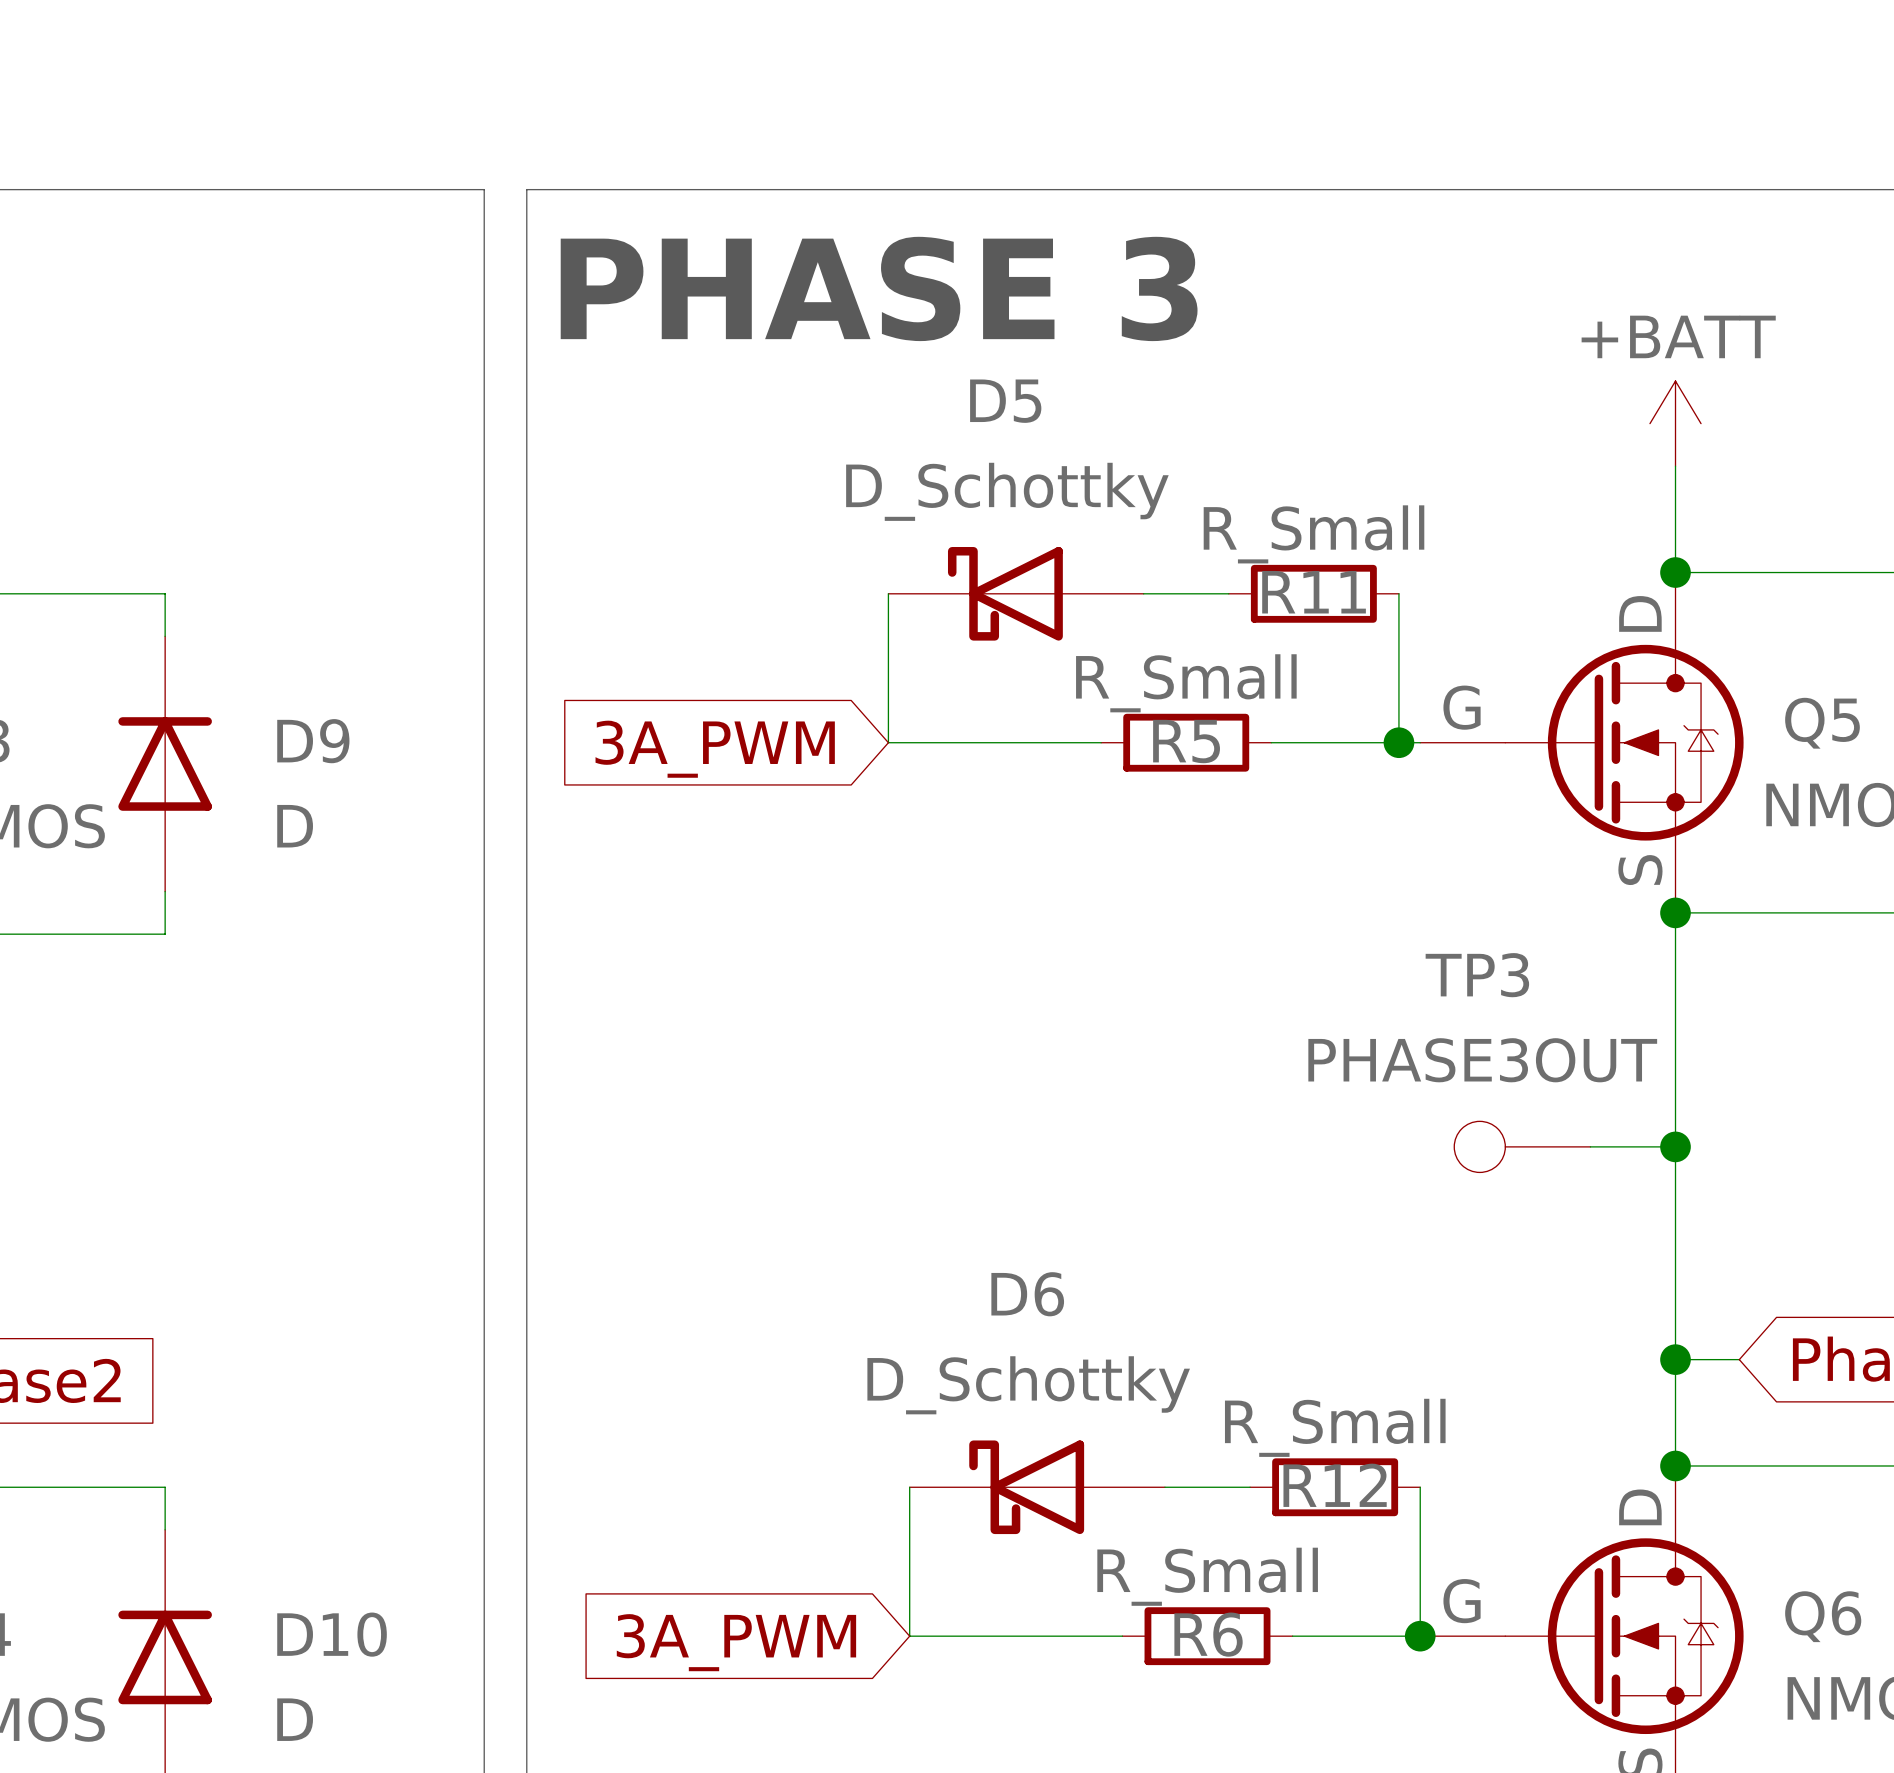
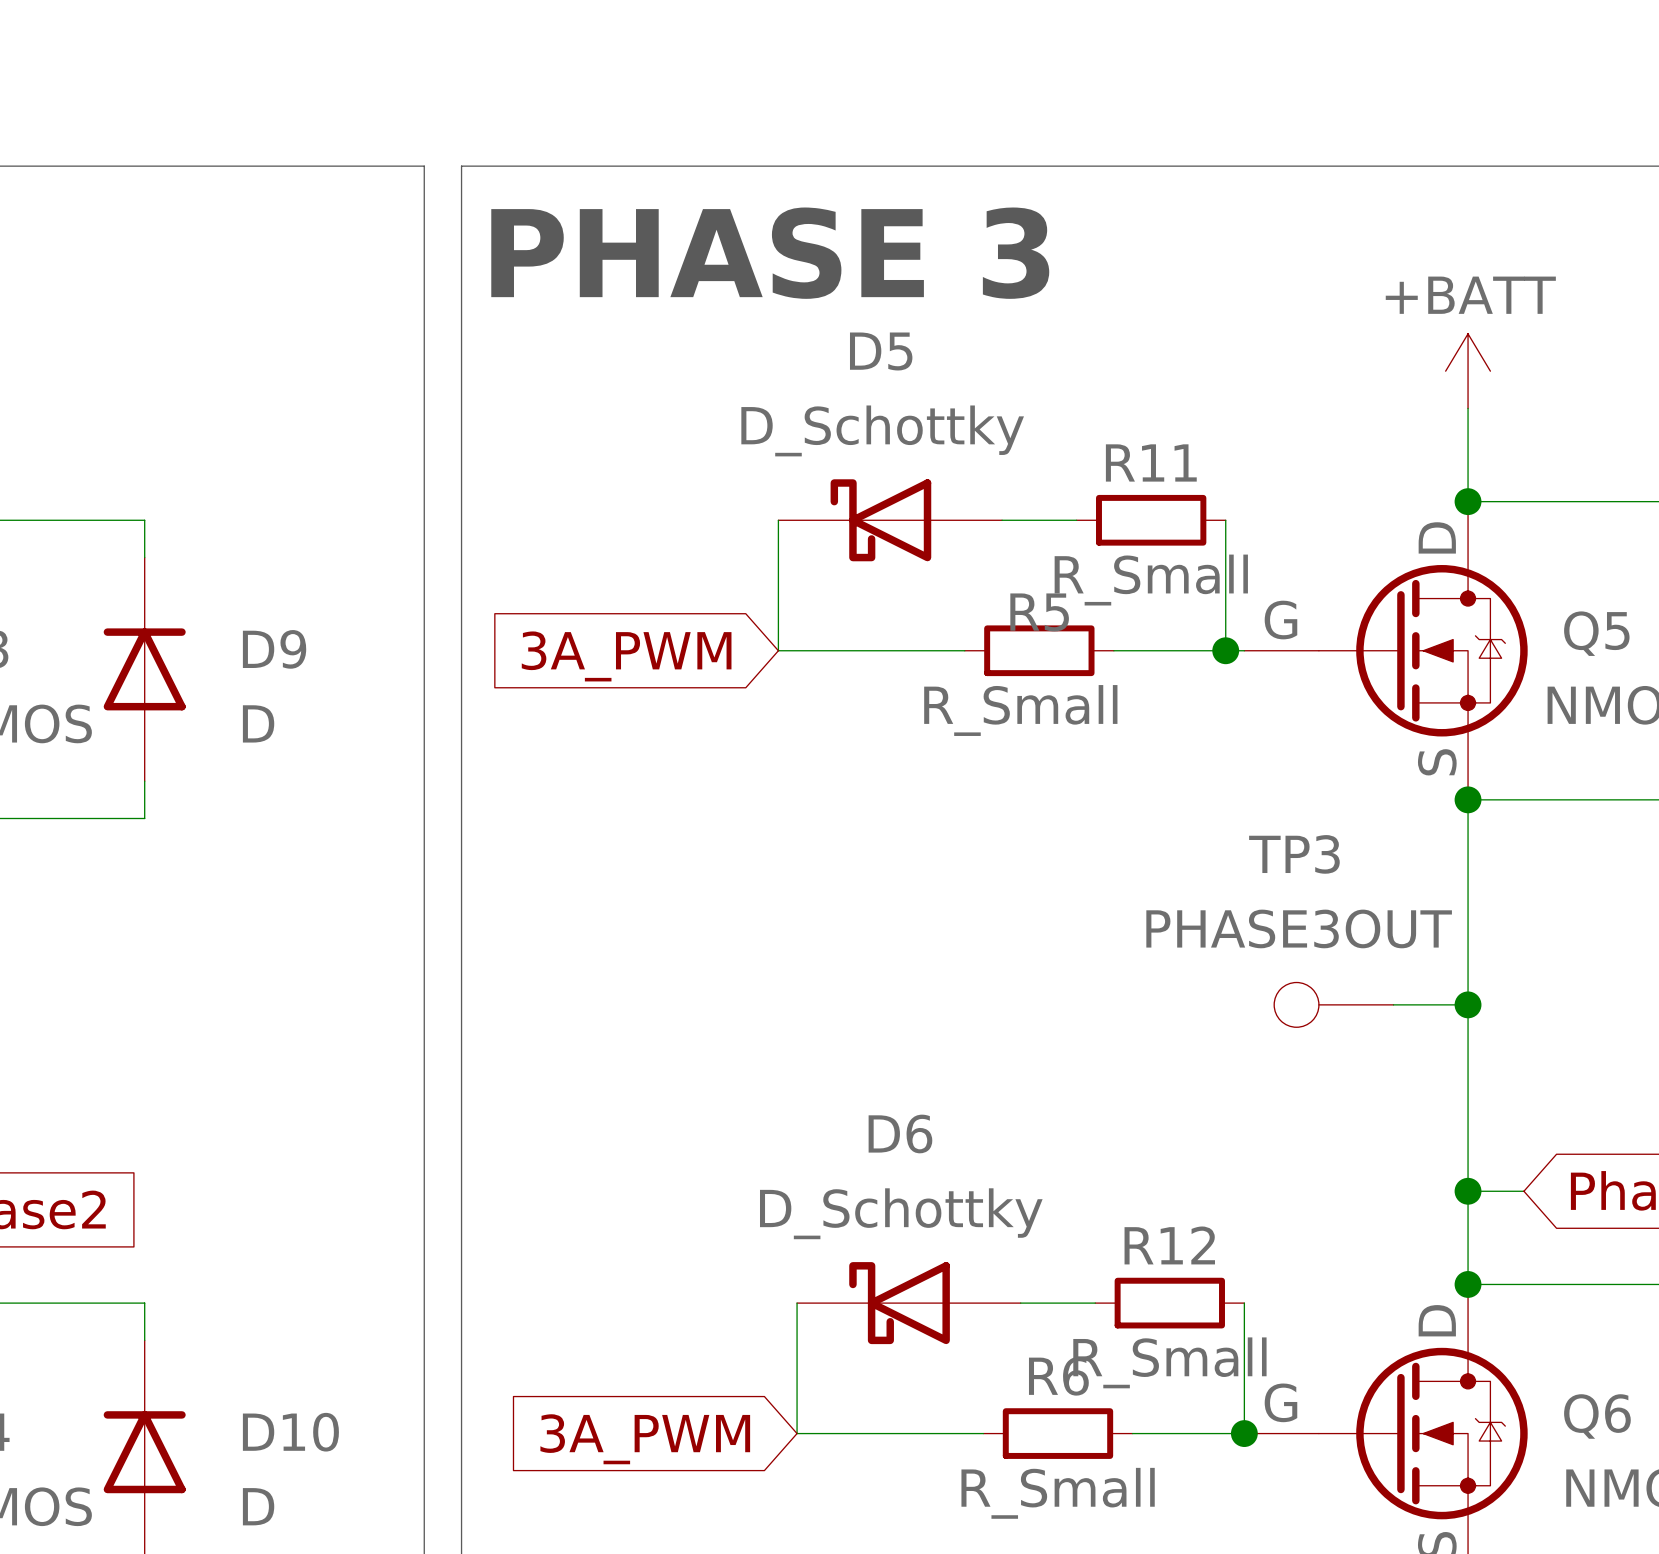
R11 value position: R_Small (1313, 534) -> R_Small (1151, 580)
R11 name position: R11 (1314, 592) -> R11 (1151, 462)
R5 value position: R_Small (1186, 683) -> R_Small (1020, 710)
R5 name position: R5 (1186, 741) -> R5 (1039, 612)
R12 value position: R_Small (1335, 1427) -> R_Small (1169, 1362)
R12 name position: R12 (1335, 1485) -> R12 (1169, 1245)
R6 value position: R_Small (1207, 1576) -> R_Small (1058, 1493)
R6 name position: R6 (1208, 1634) -> R6 (1058, 1376)

